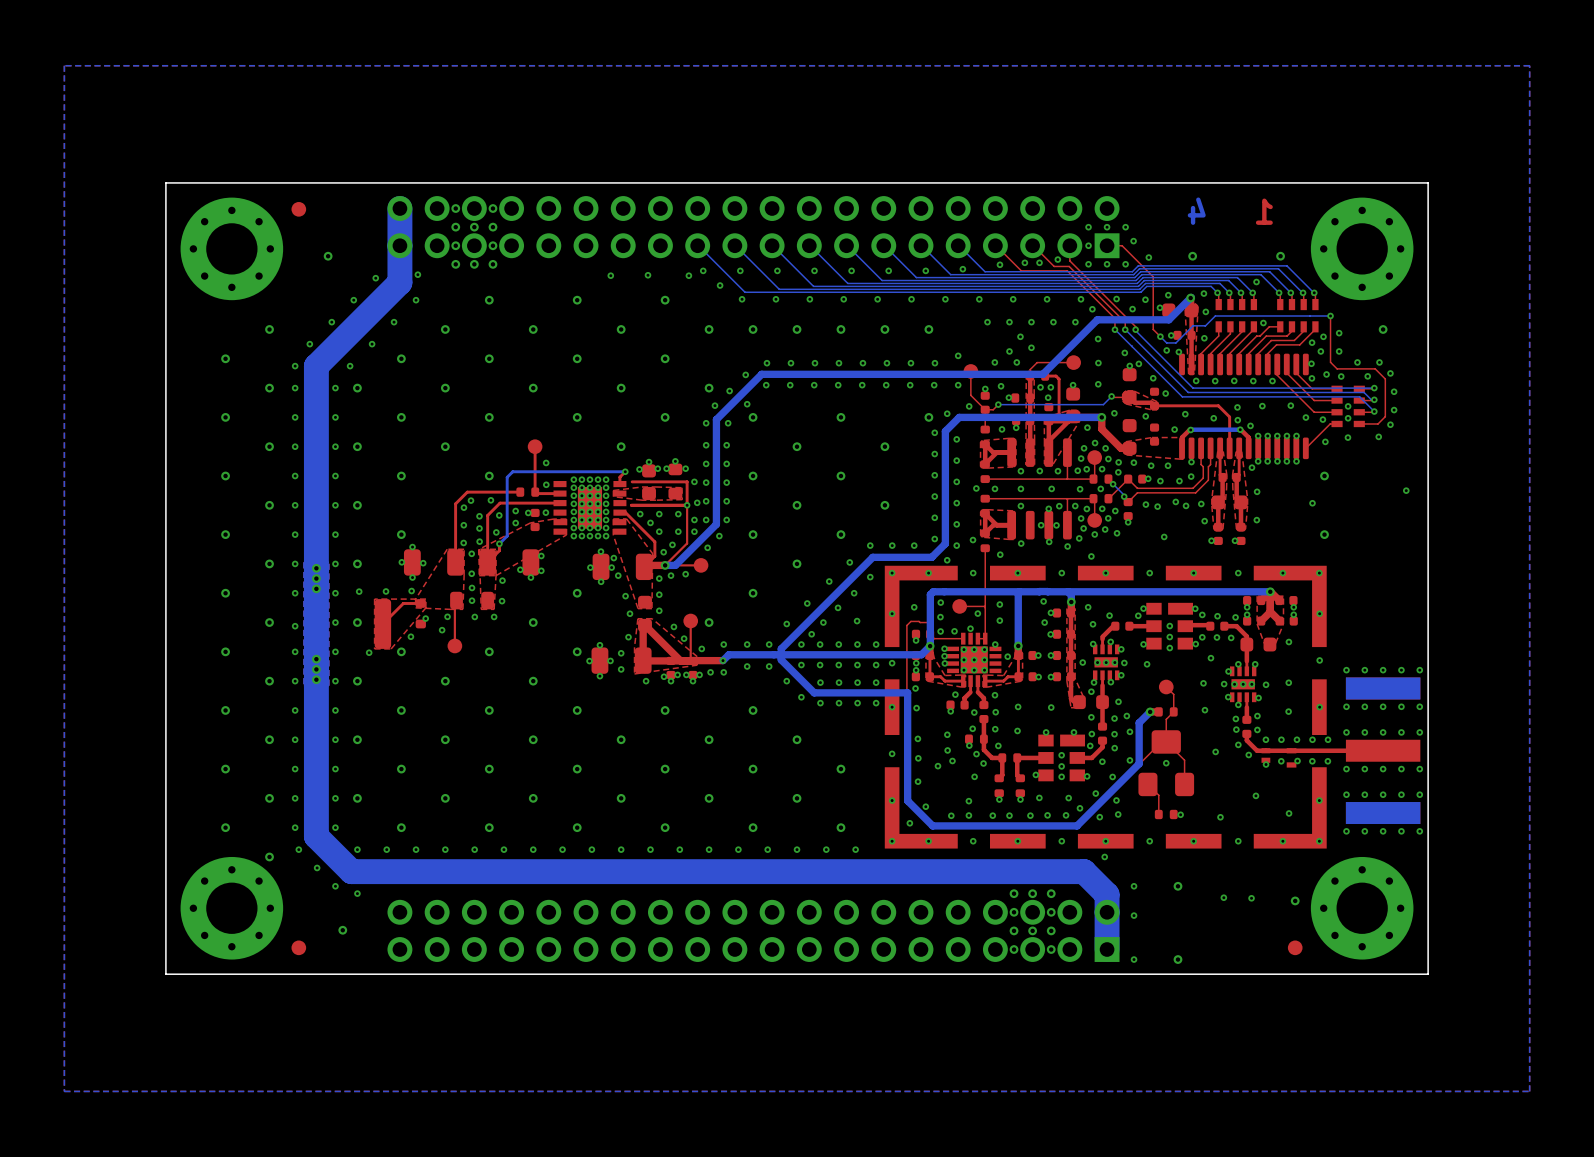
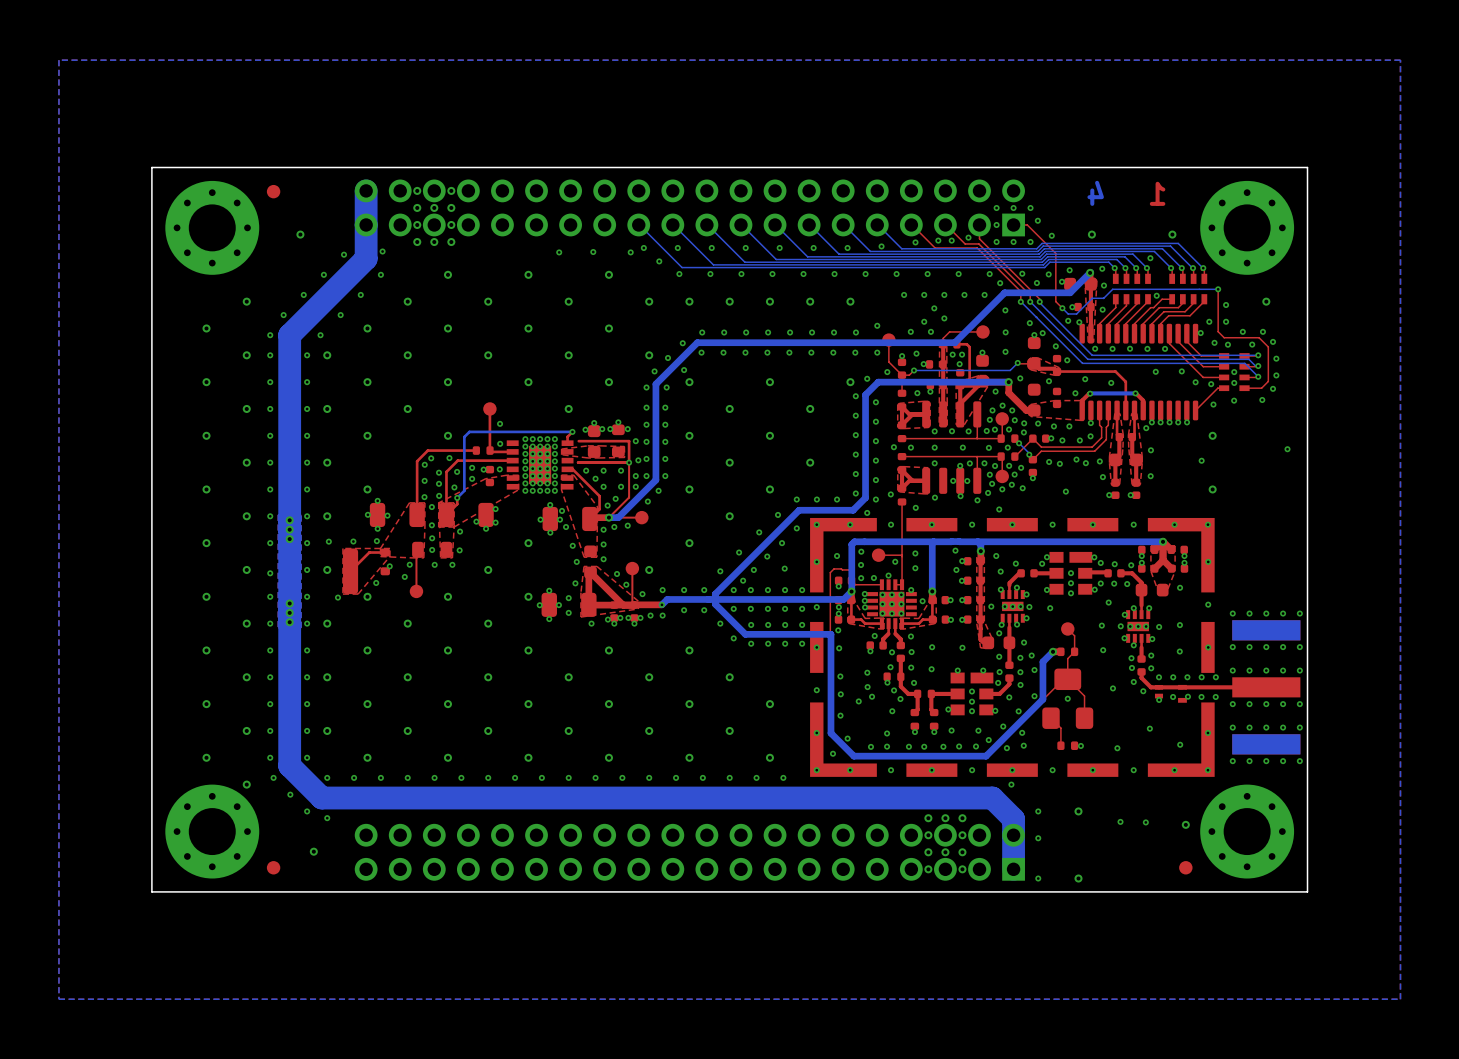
via: (1323, 336) -> none
via: (1312, 342) -> none
via: (1311, 378) -> none
via: (1237, 407) -> none
via: (1237, 420) -> none
via: (1250, 425) -> none
via: (1258, 436) -> none
via: (1267, 436) -> none
via: (1277, 436) -> none
via: (1286, 436) -> none
via: (1296, 436) -> none

